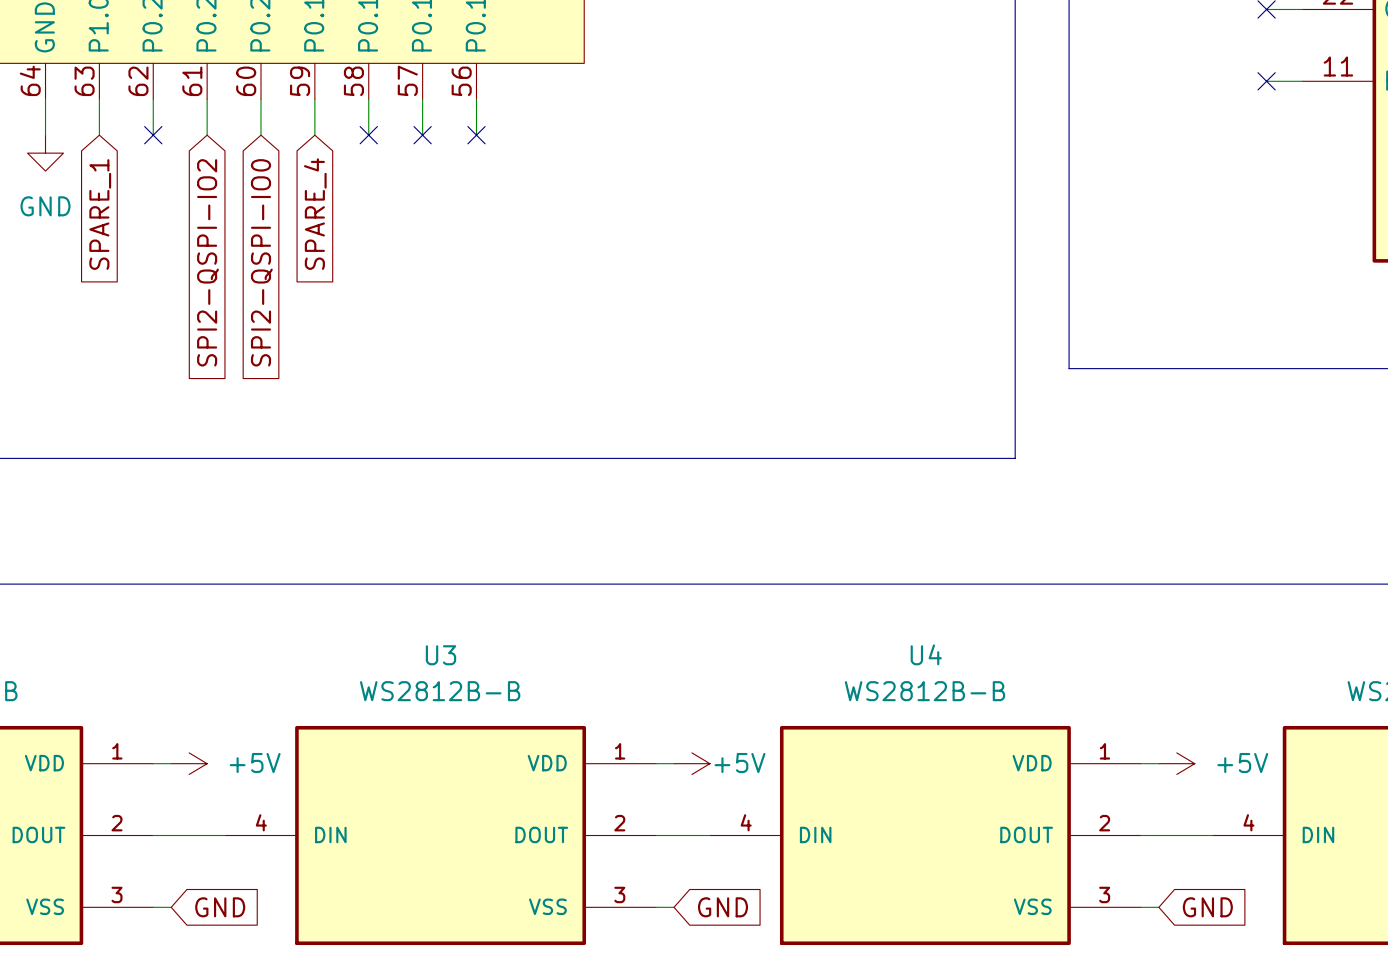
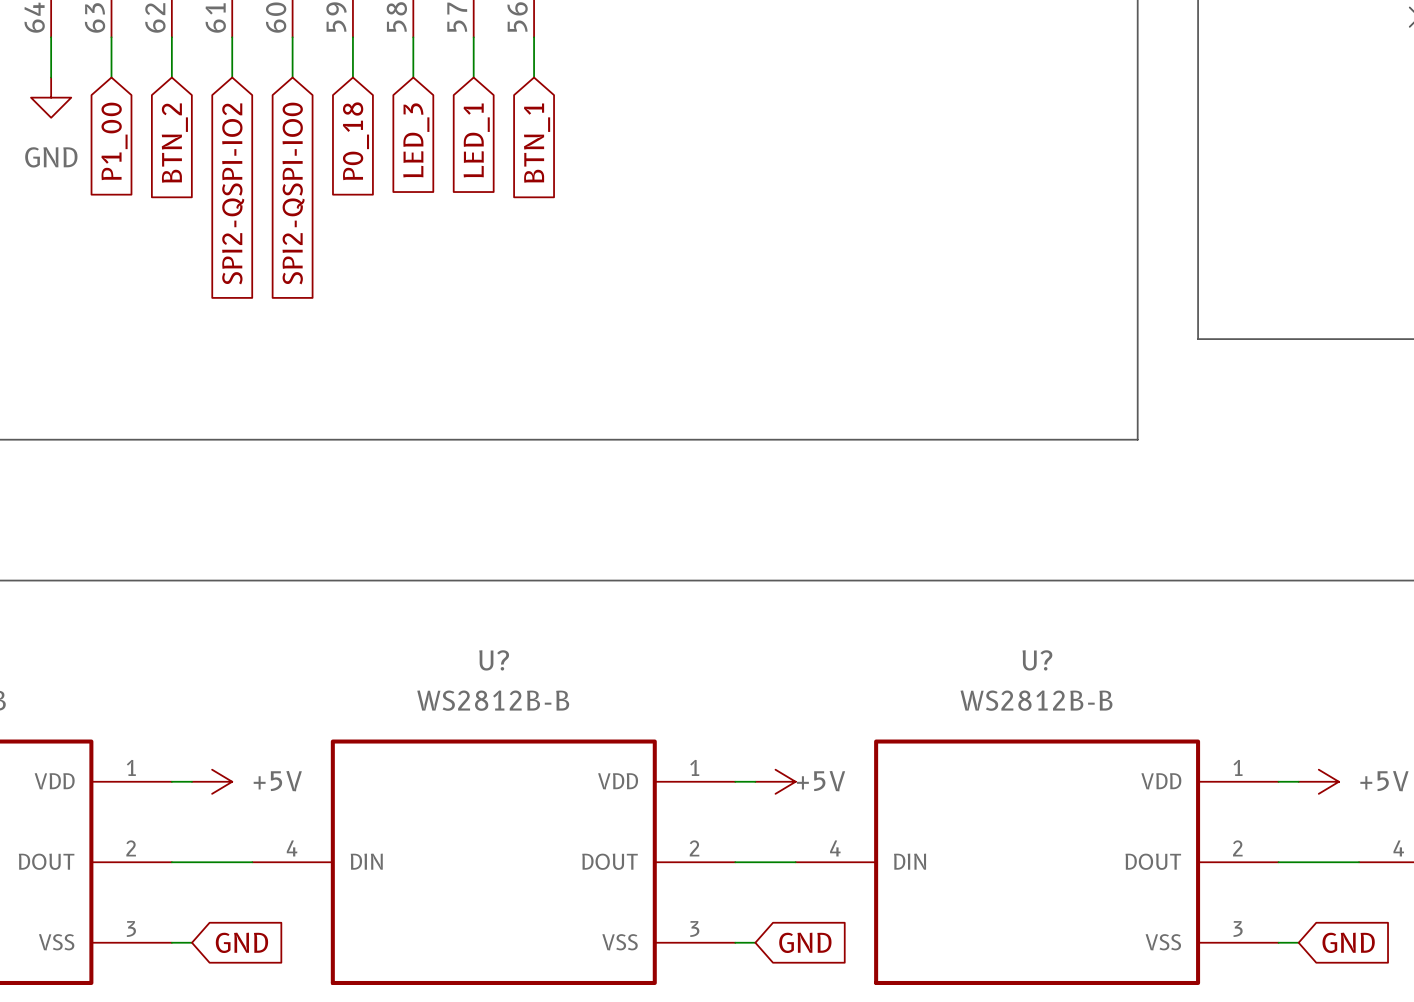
no-connect mark: (153, 135) -> none
no-connect mark: (368, 135) -> none
no-connect mark: (422, 135) -> none
no-connect mark: (476, 135) -> none
global label: none -> BTN_2 (174, 143)
global label: none -> LED_3 (416, 140)
global label: none -> LED_1 (476, 140)
global label: none -> BTN_1 (537, 143)
global label: SPARE_1 (100, 214) -> P1_00 (114, 141)
global label: SPARE_4 (315, 214) -> P0_18 (355, 141)
U4 name: U4 (926, 654) -> U? (1037, 660)
U3 name: U3 (441, 655) -> U? (494, 660)

